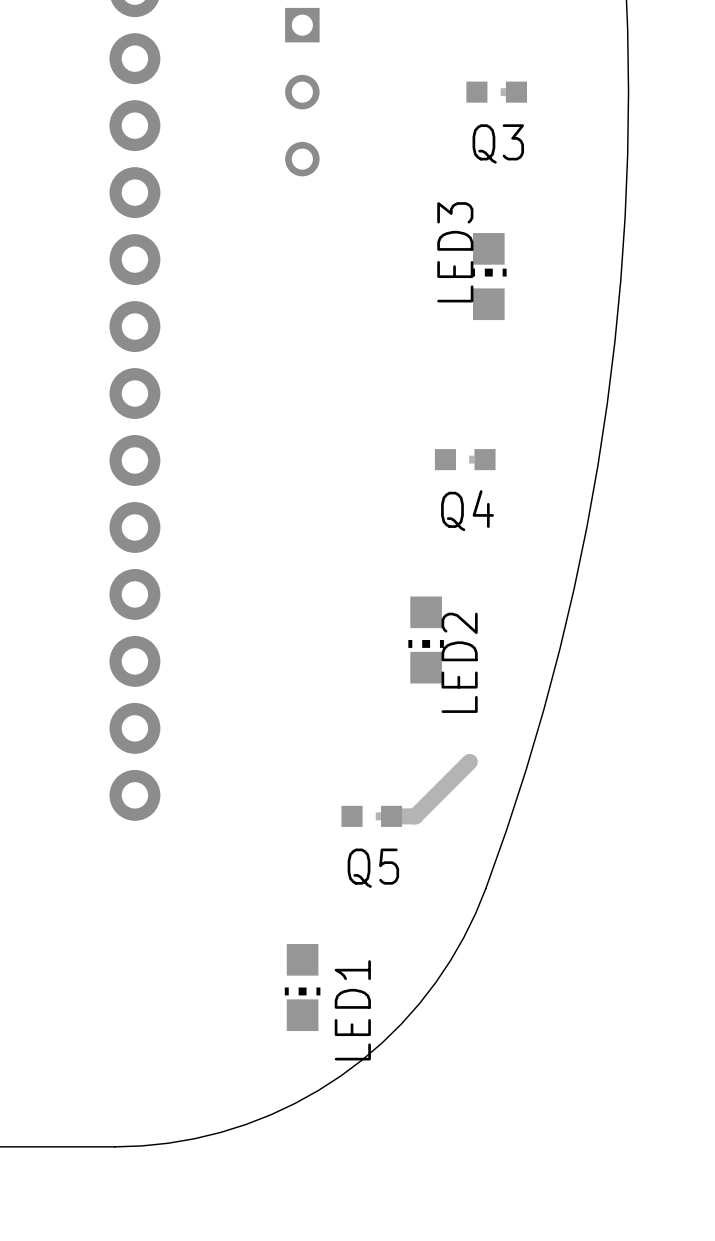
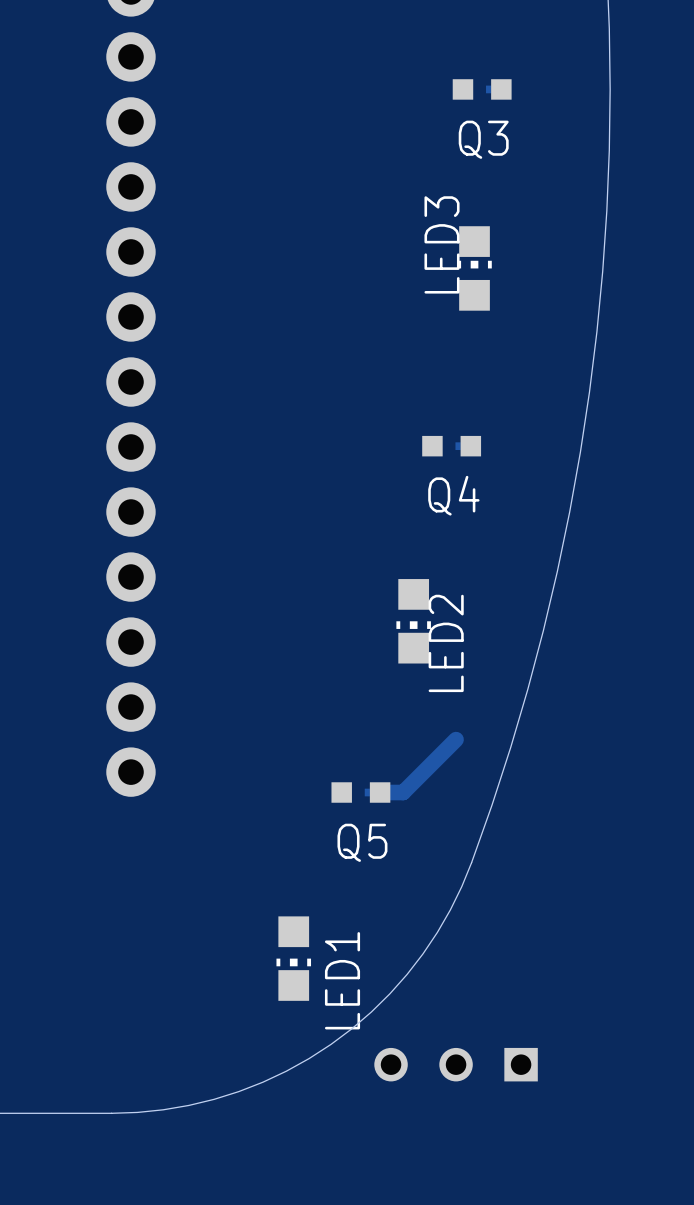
part: (302, 92) -> none
part: none -> (456, 1064)

